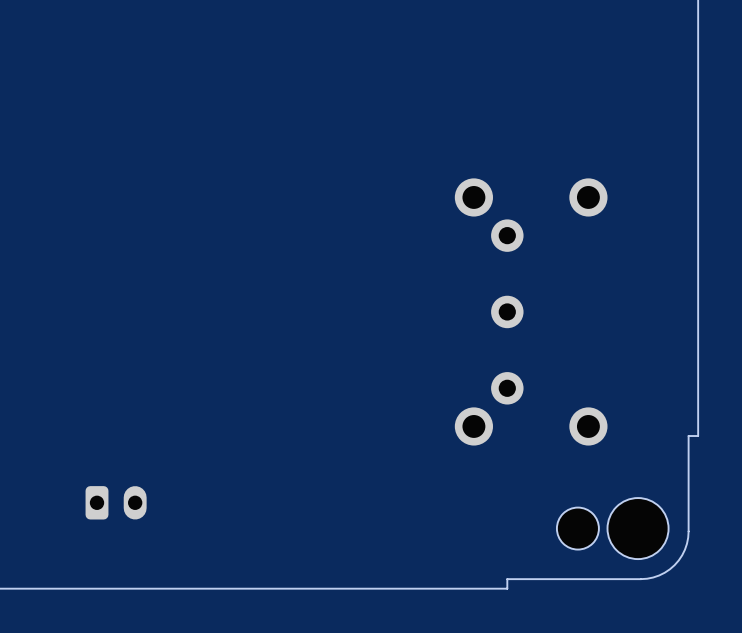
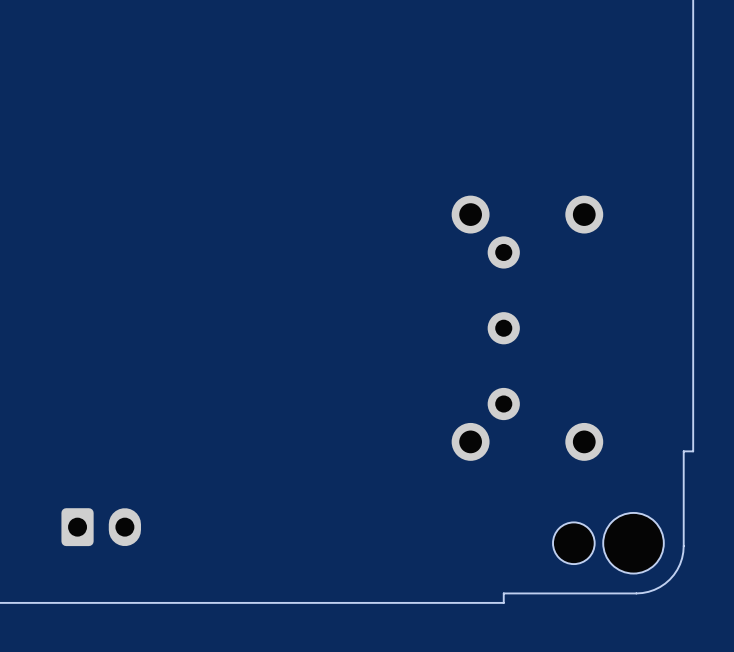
part footprint: [85, 486, 147, 520] -> [61, 508, 141, 547]

